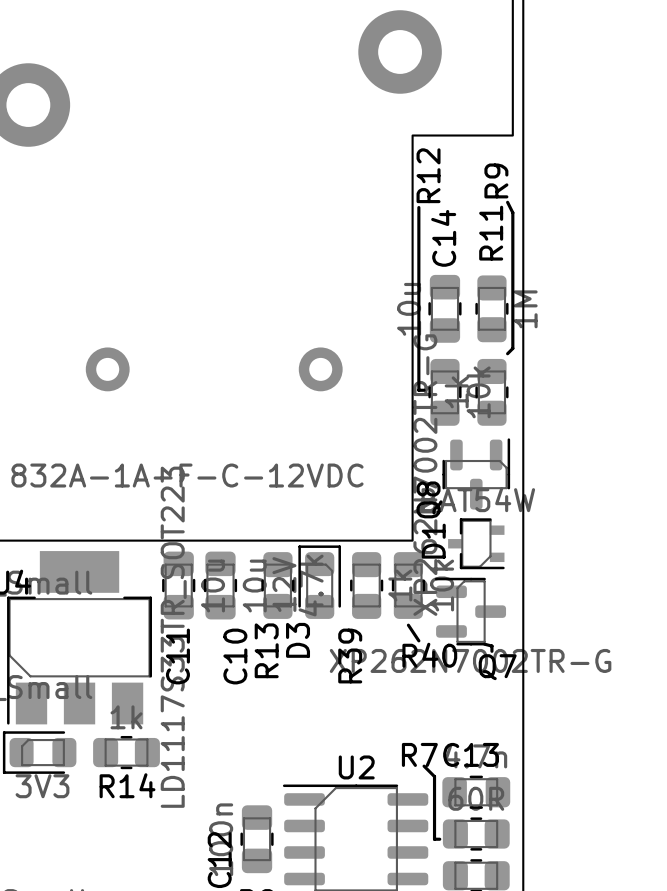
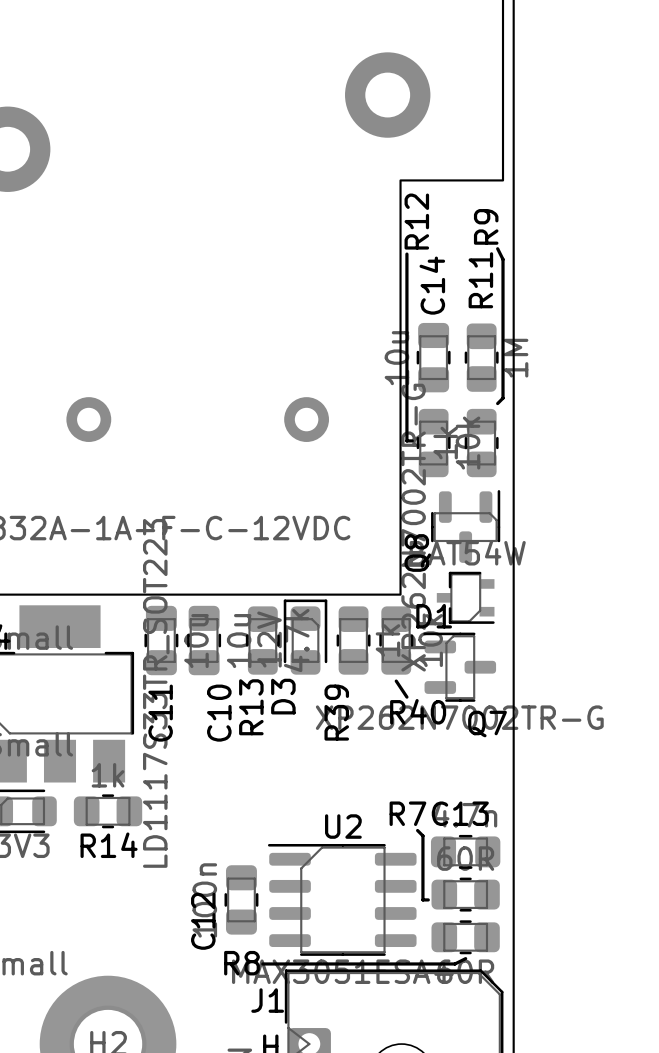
D1 name rotation: 0° (433, 541) -> 90° clockwise (434, 616)
line: (484, 644) (491, 646) (491, 651) -> none
line: (424, 766) (429, 771) -> none

